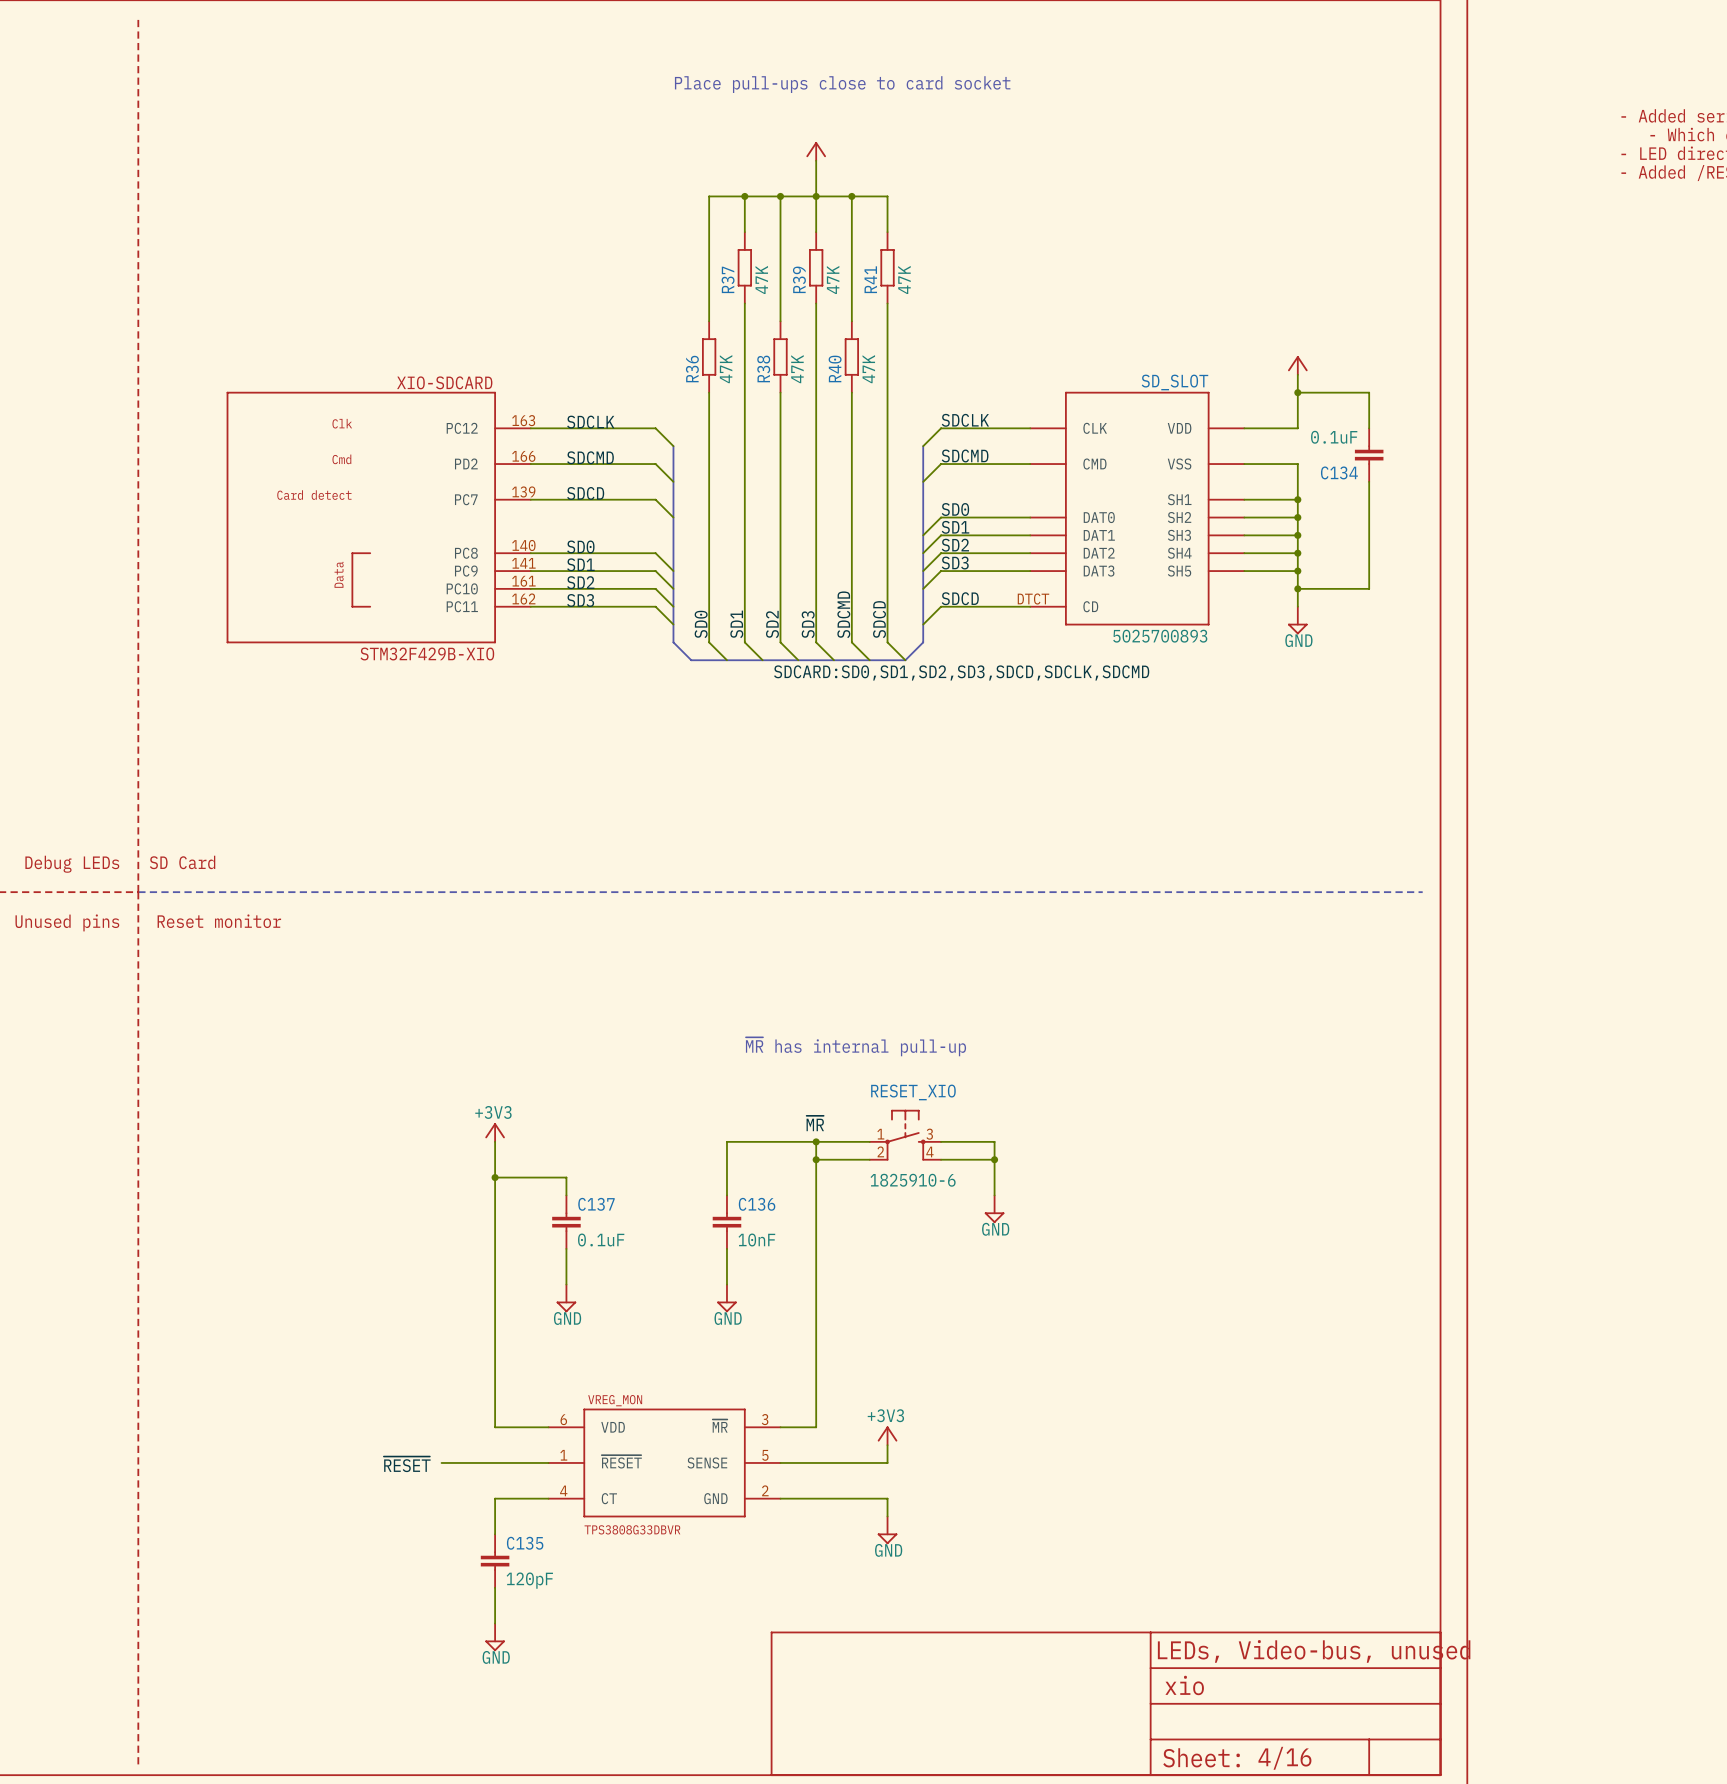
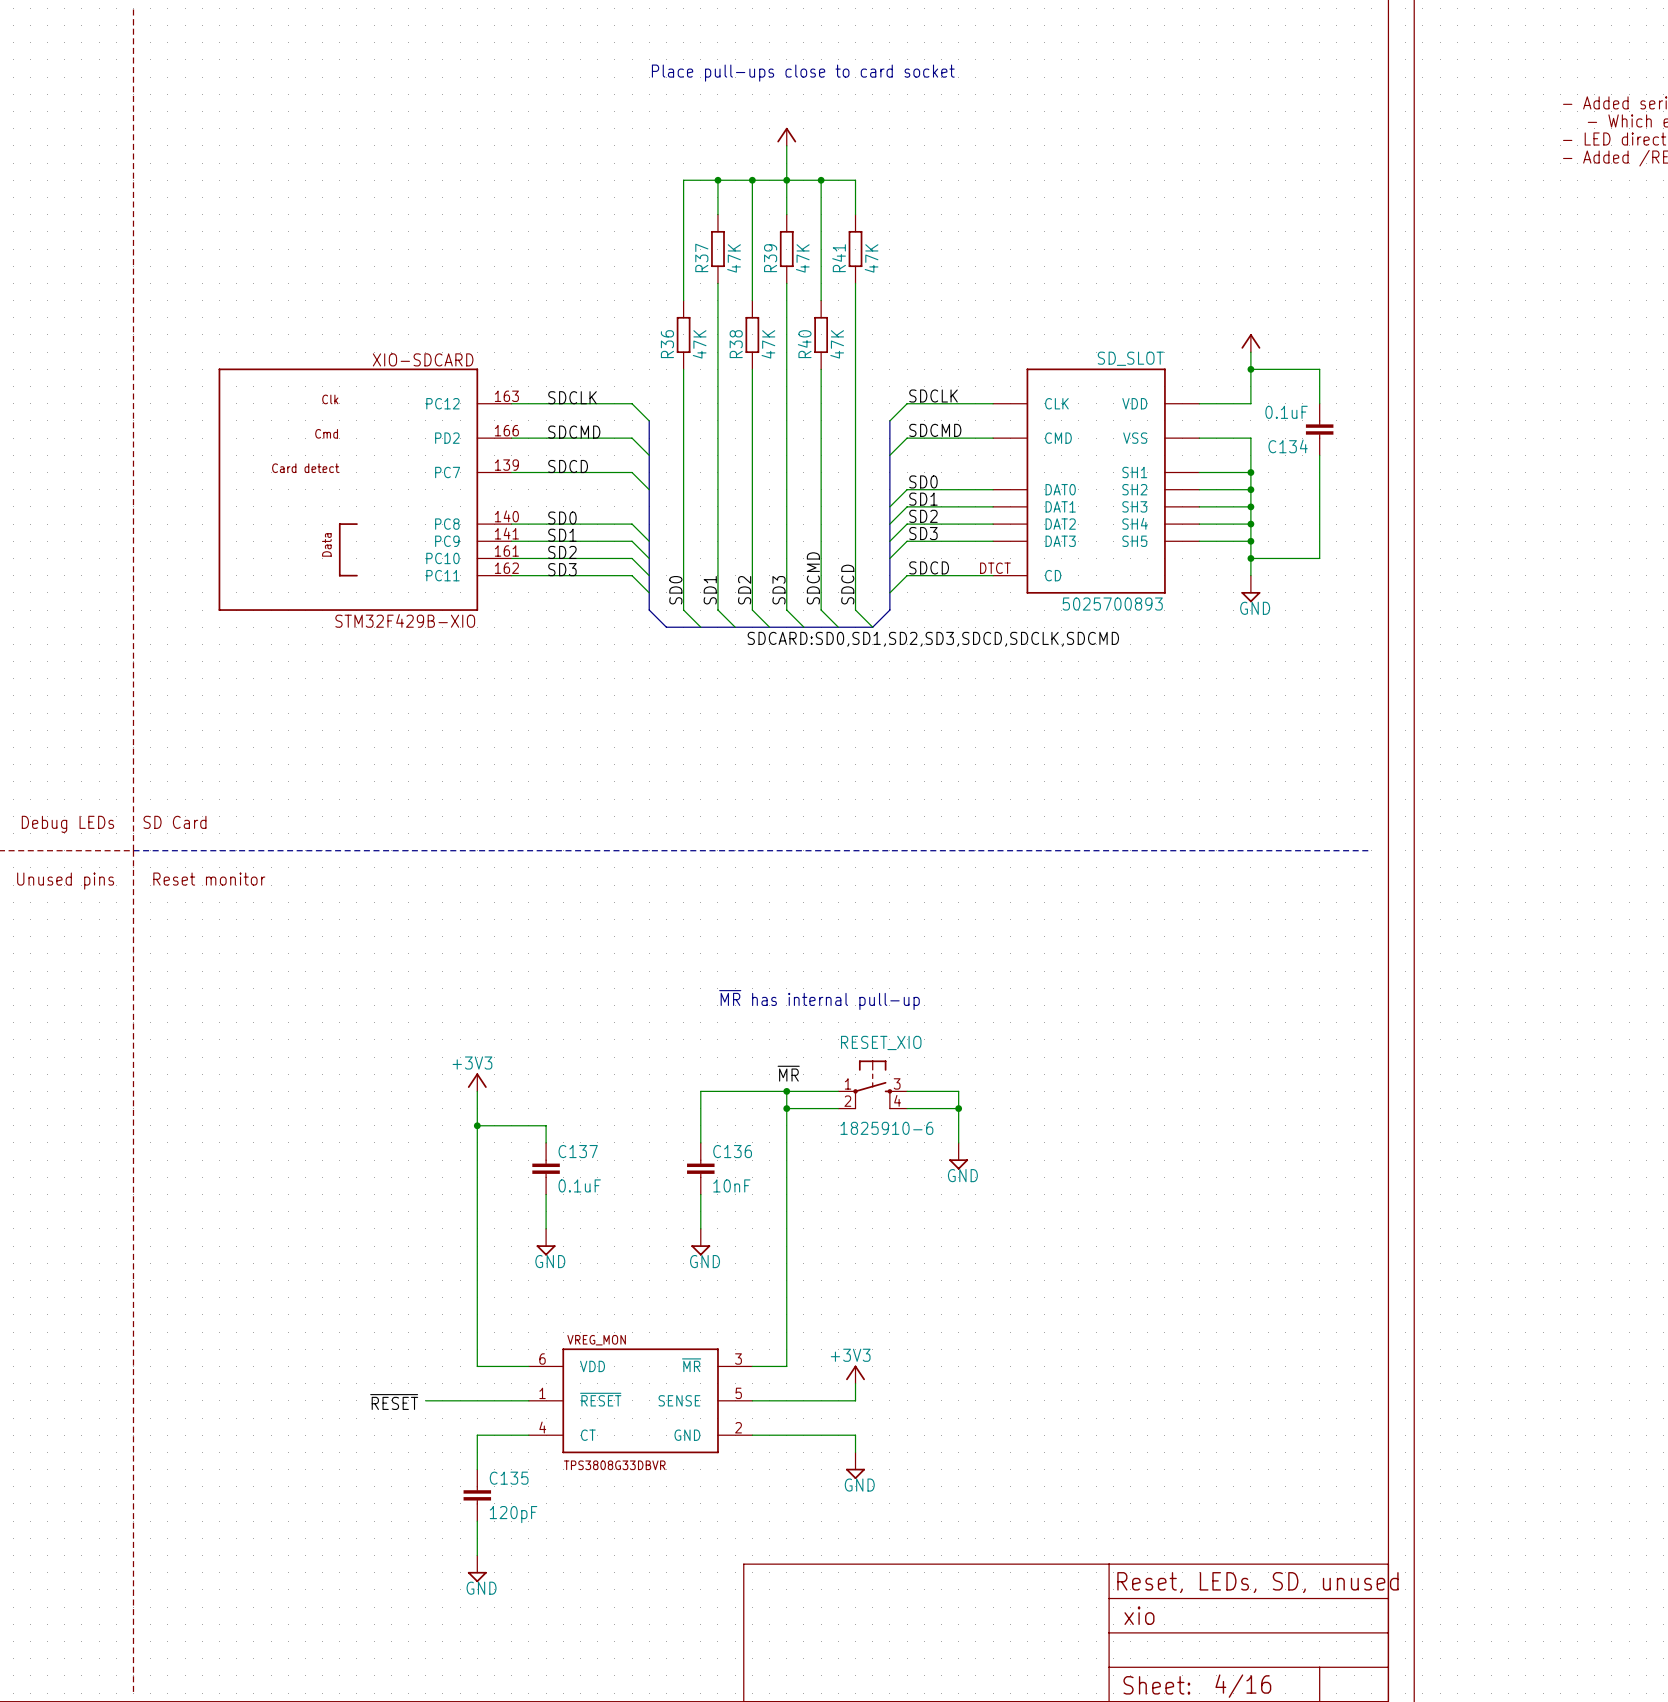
text: LEDs, Video-bus, unused (1314, 1651) -> Reset, LEDs, SD, unused (1257, 1582)

